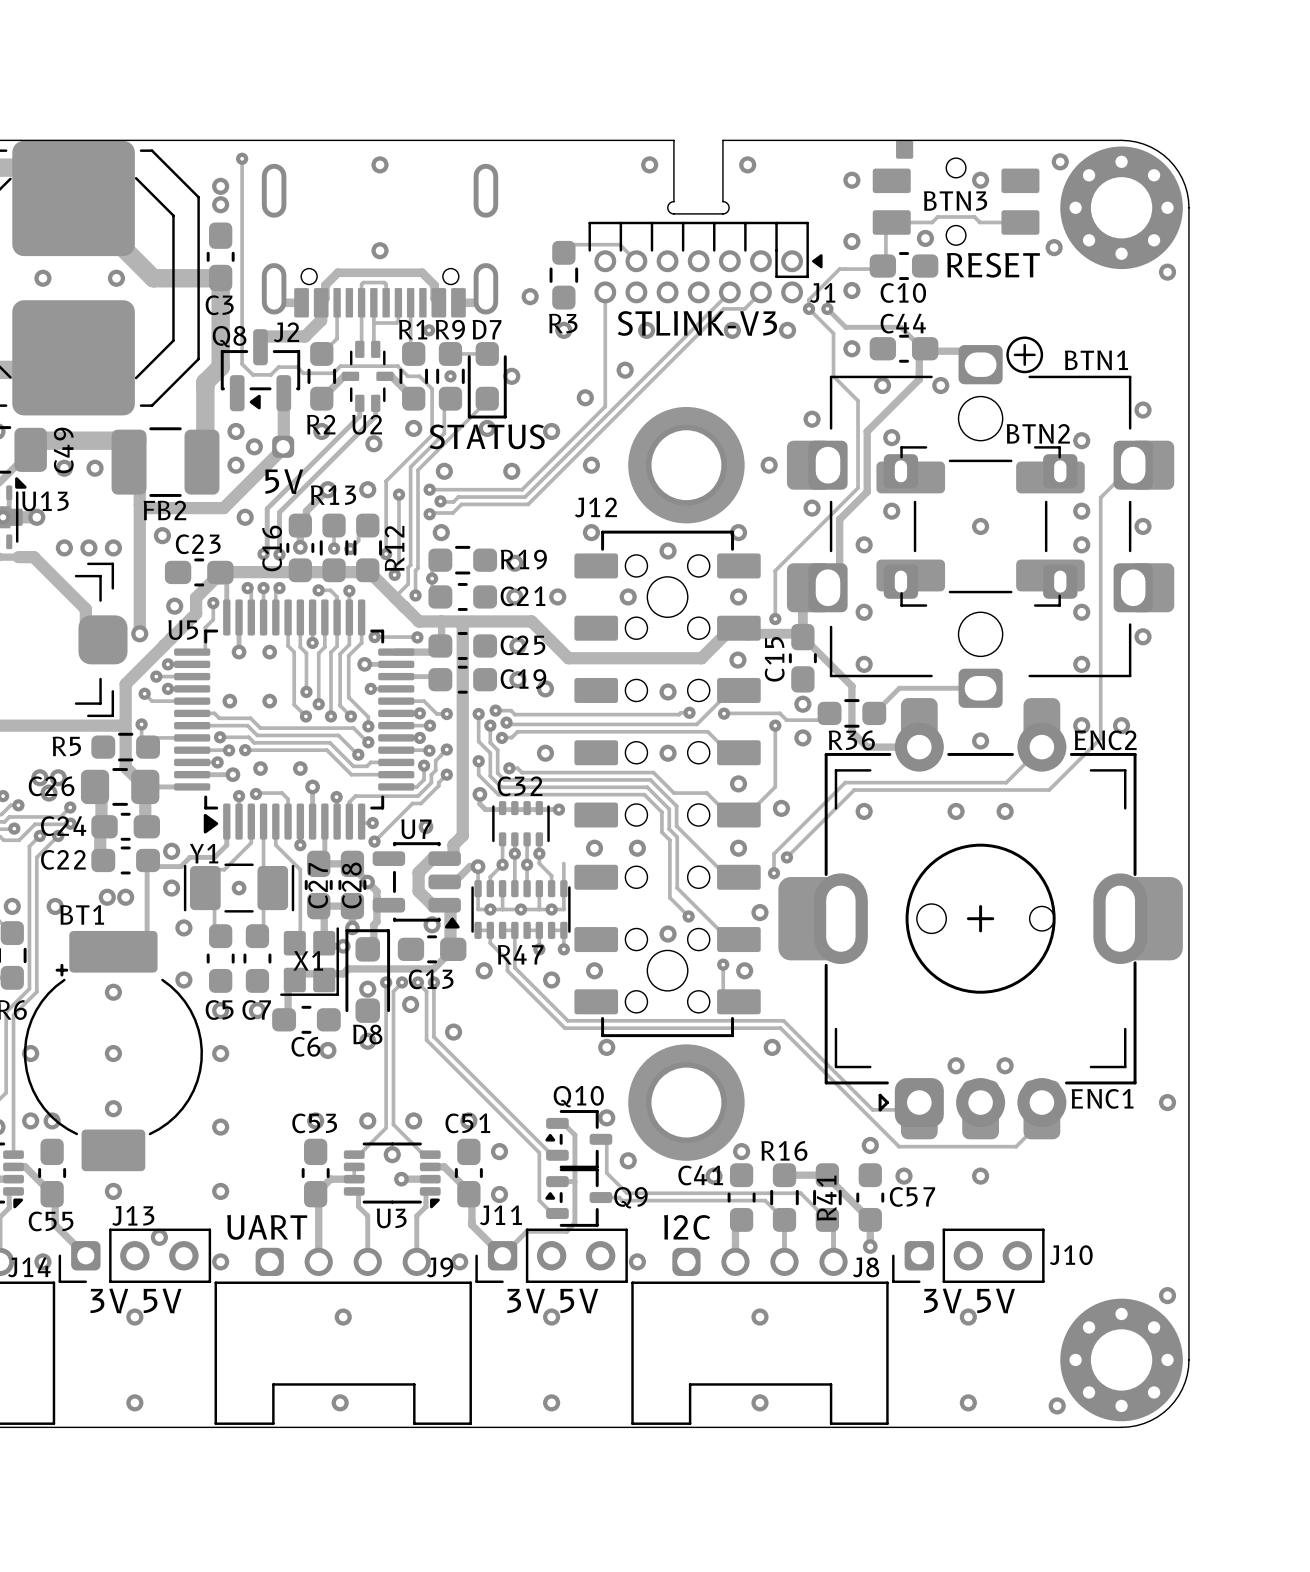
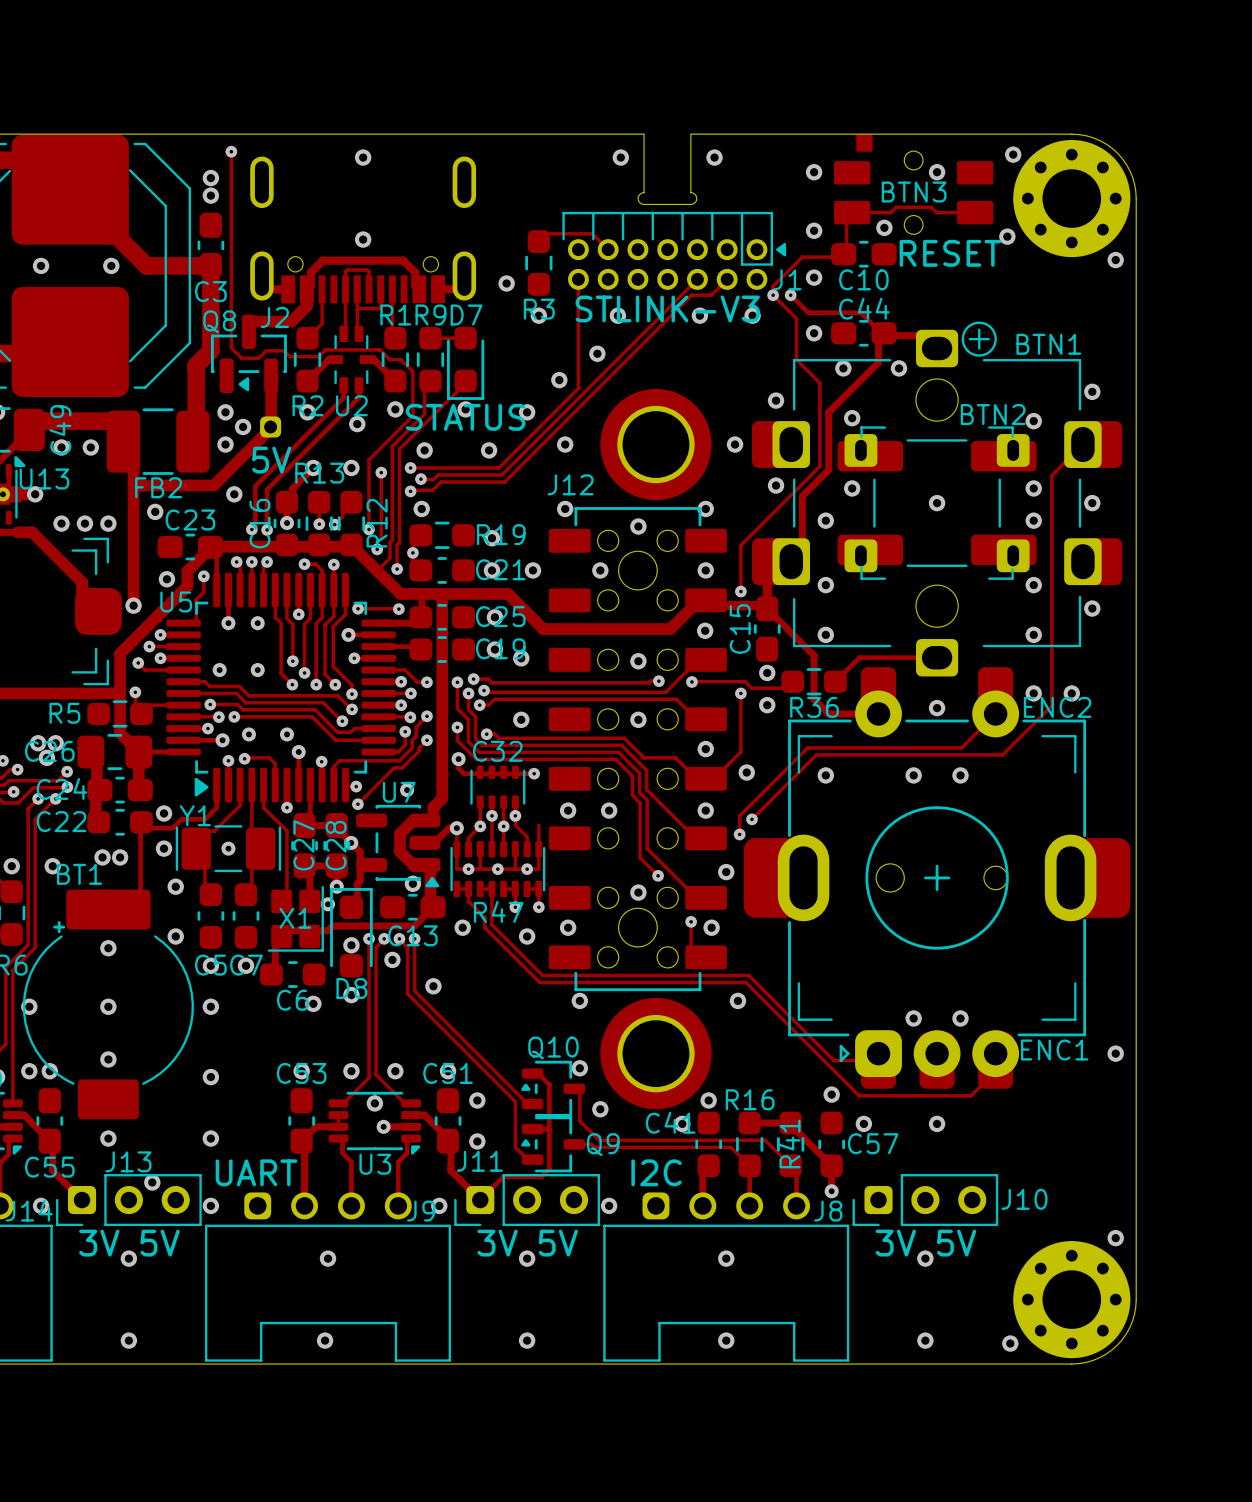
via: (429, 330) -> none
via: (450, 376) -> none
via: (511, 376) -> none

